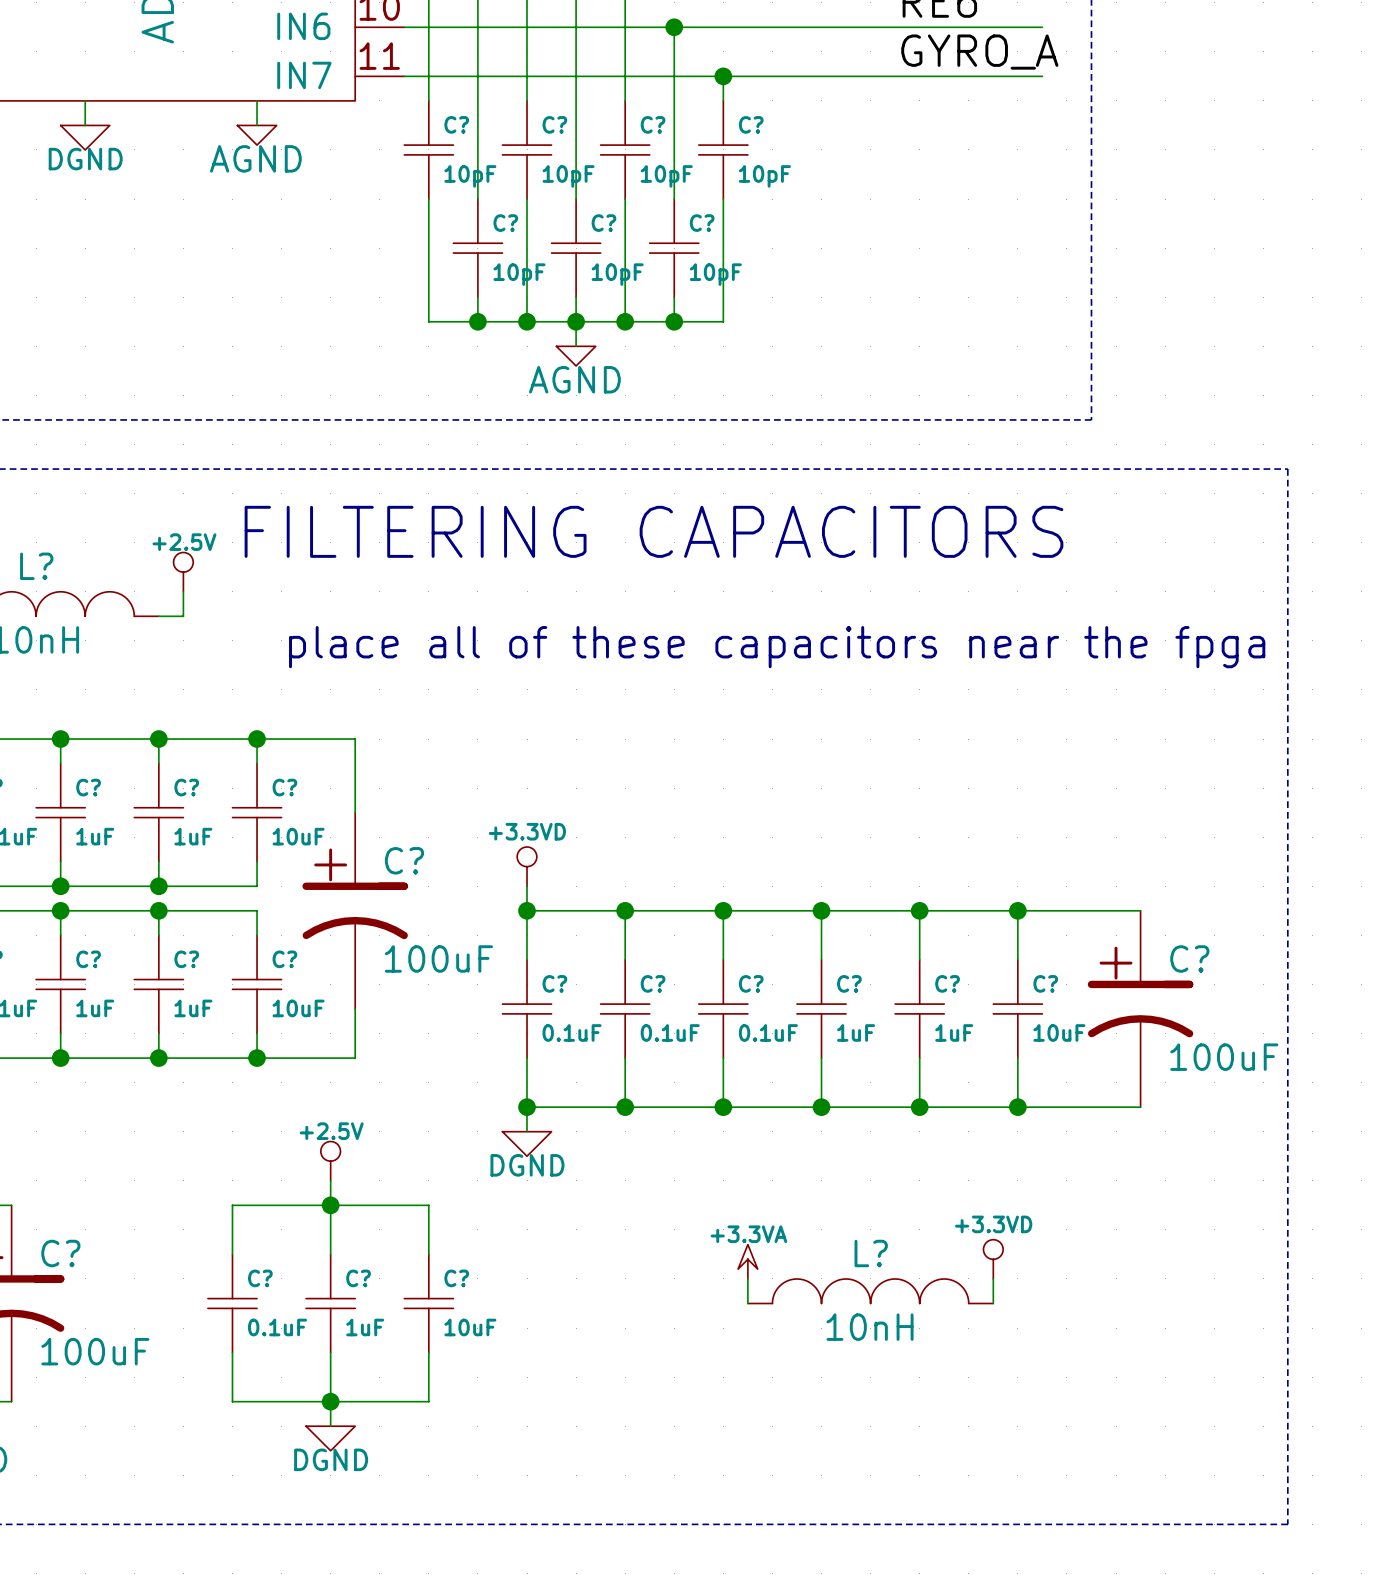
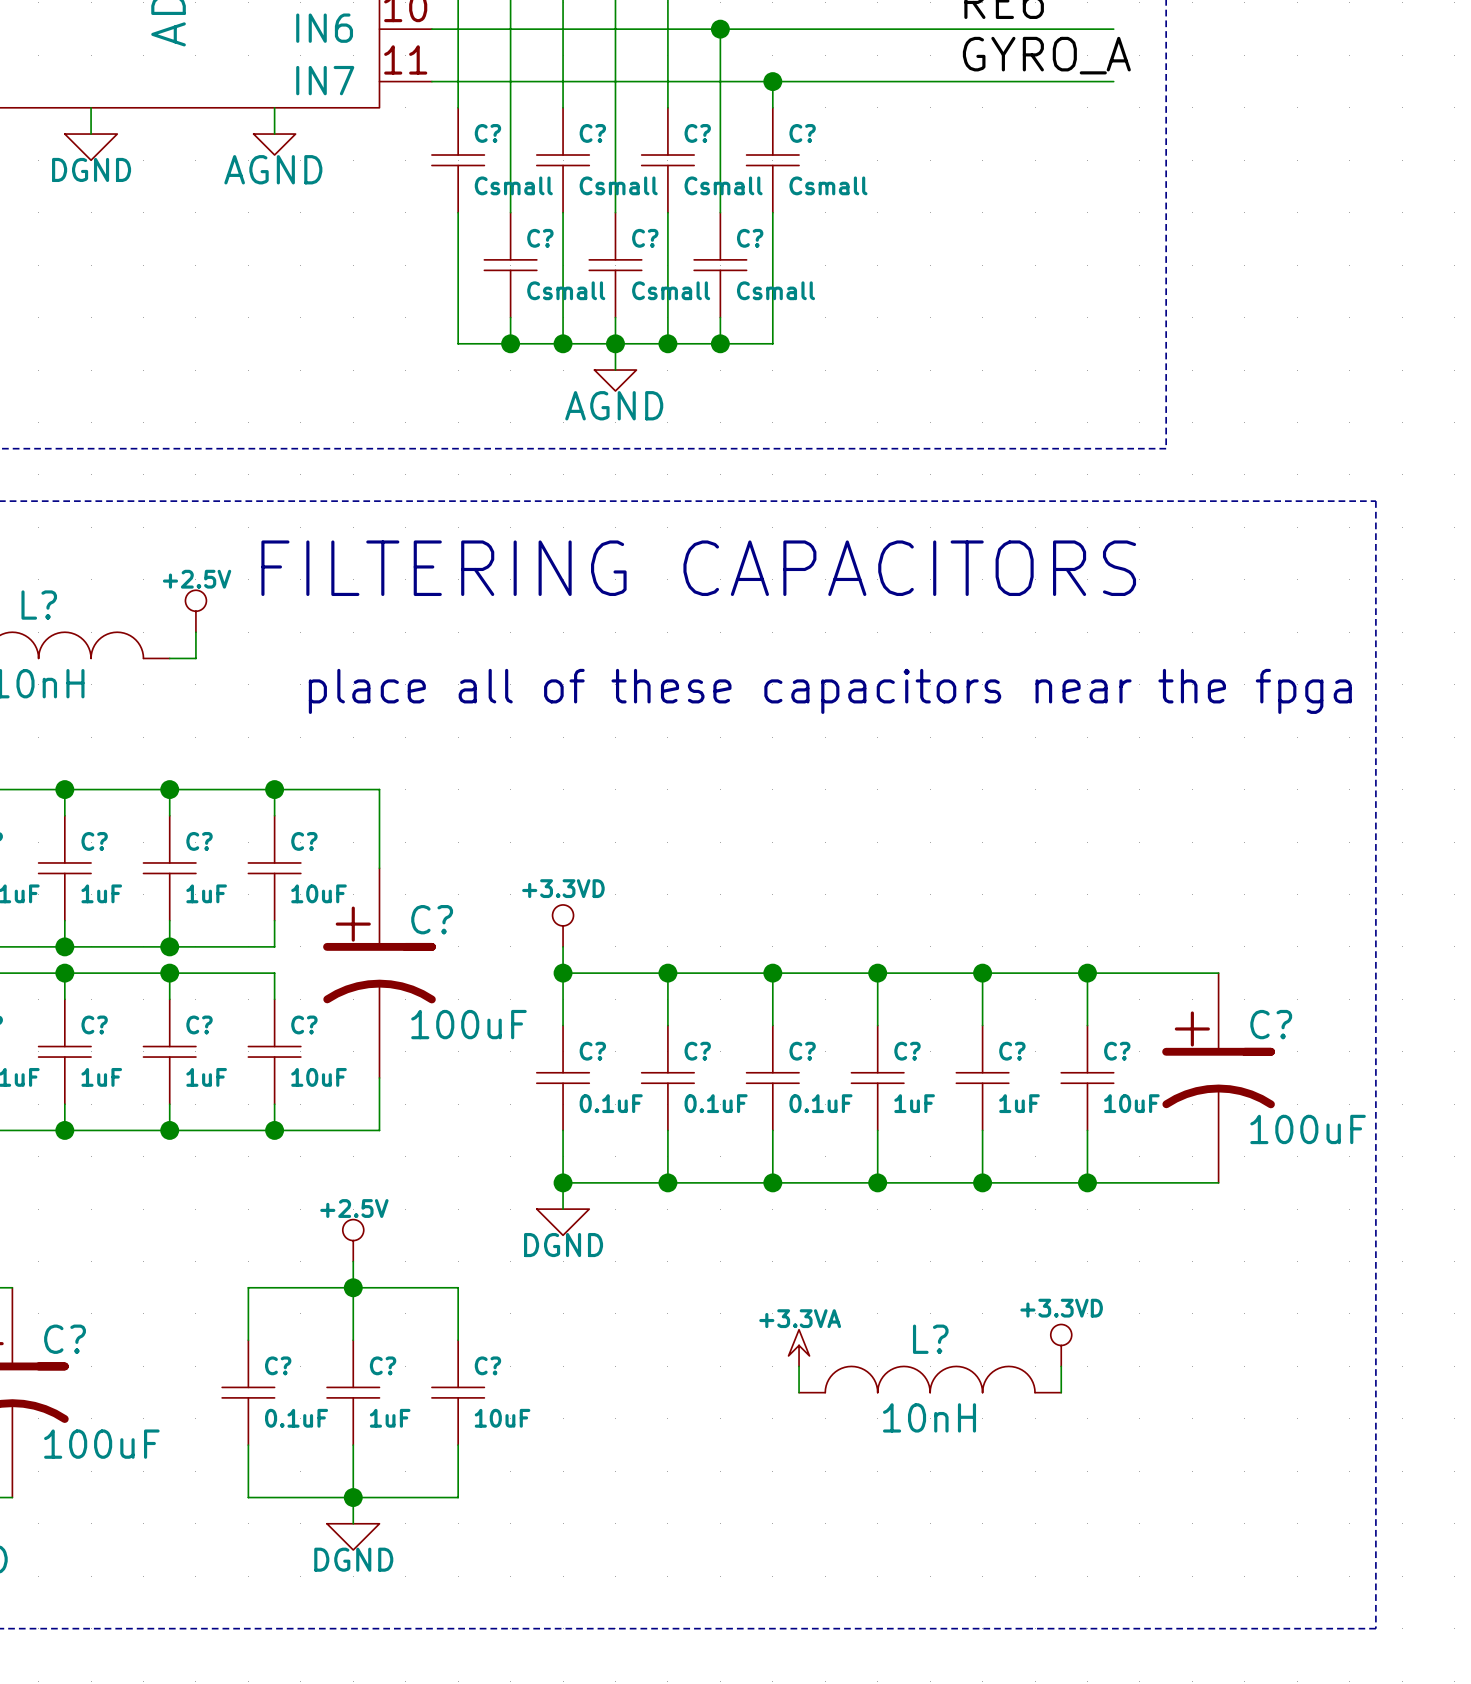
C? value: 10pF (470, 176) -> Csmall (513, 185)
C? value: 10pF (568, 176) -> Csmall (618, 185)
C? value: 10pF (666, 176) -> Csmall (723, 185)
C? value: 10pF (764, 176) -> Csmall (828, 185)
C? value: 10pF (519, 274) -> Csmall (566, 290)
C? value: 10pF (617, 274) -> Csmall (671, 290)
C? value: 10pF (715, 274) -> Csmall (776, 290)

